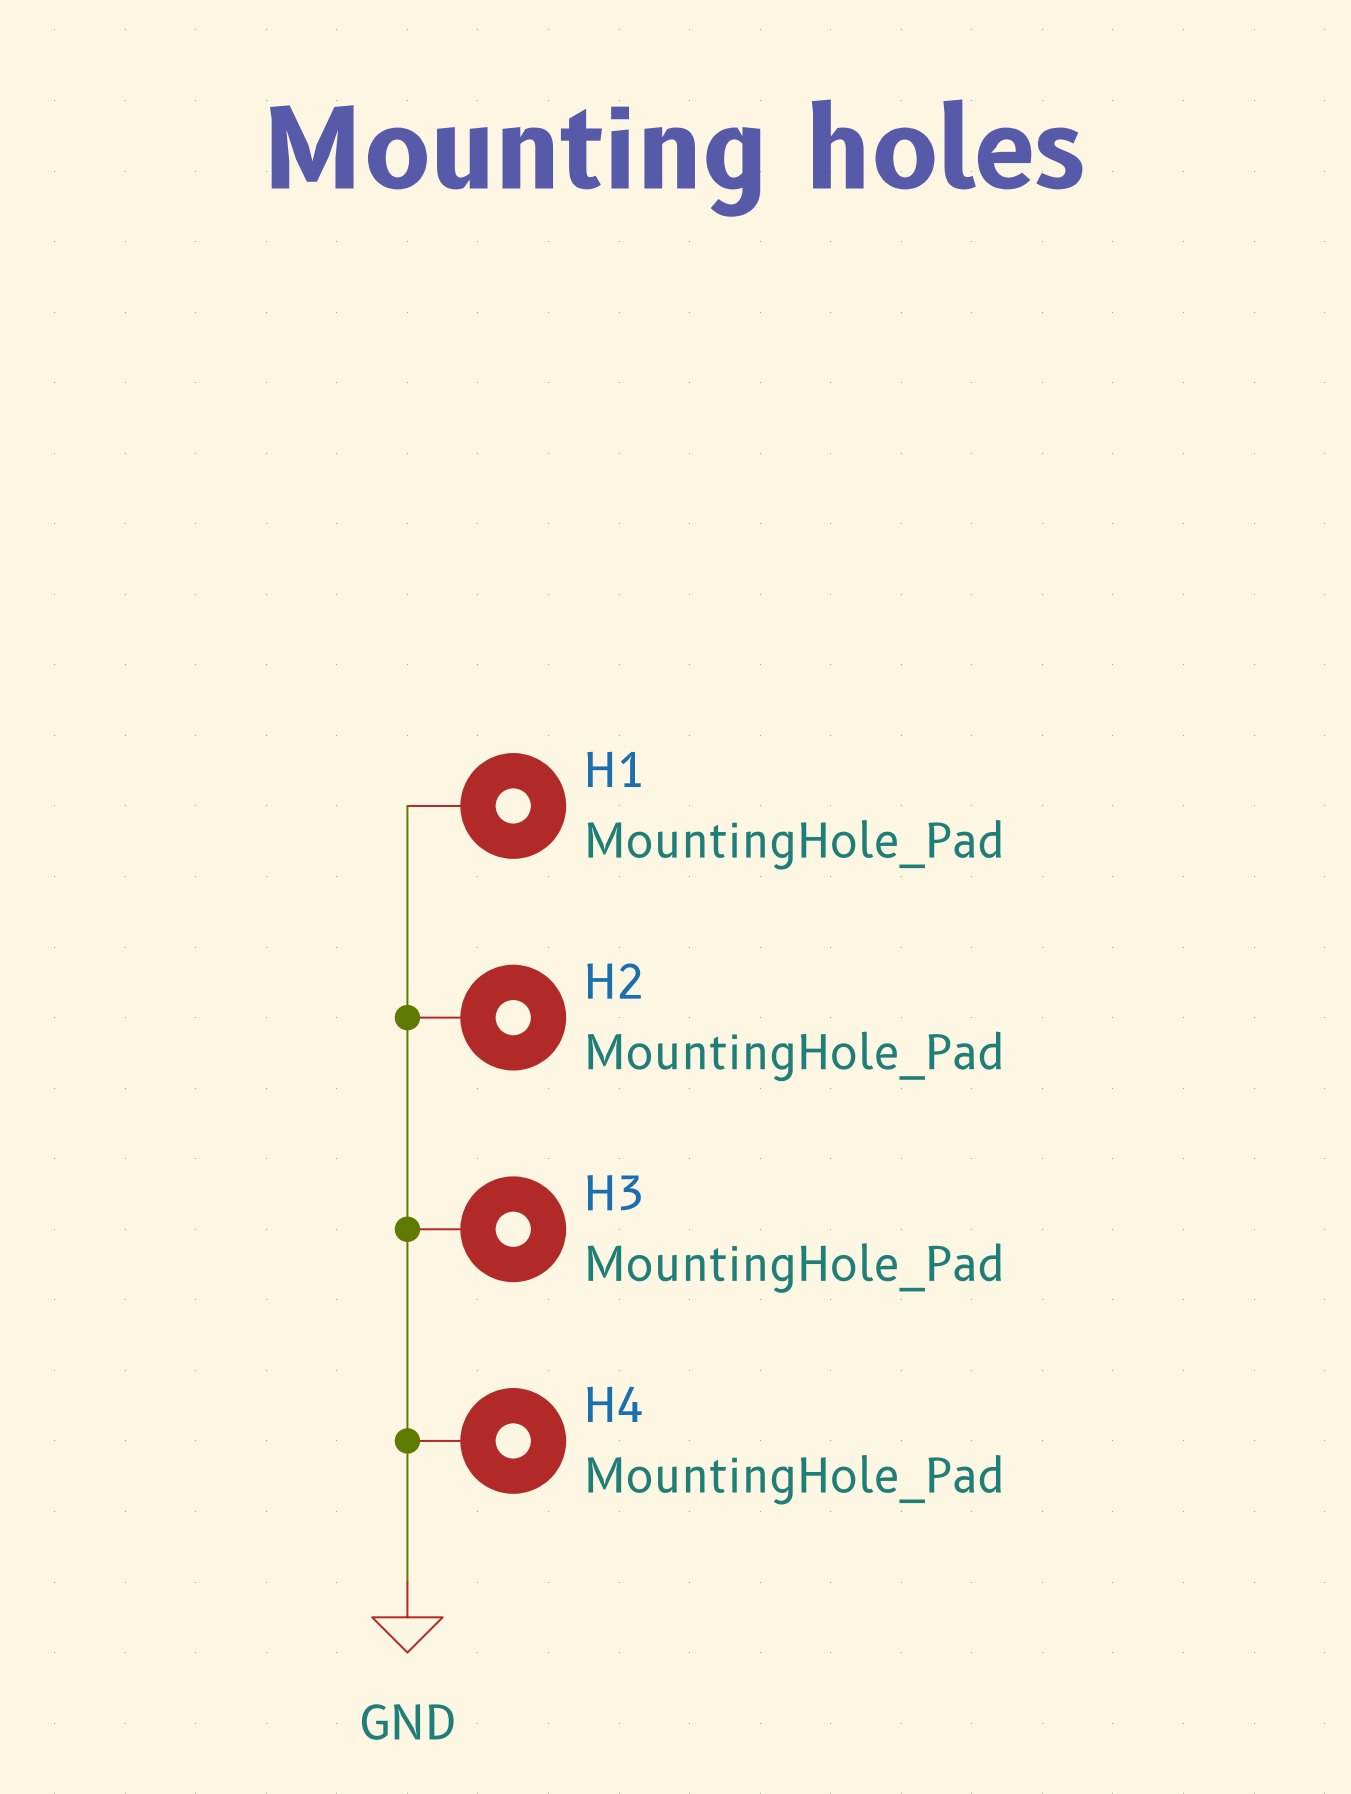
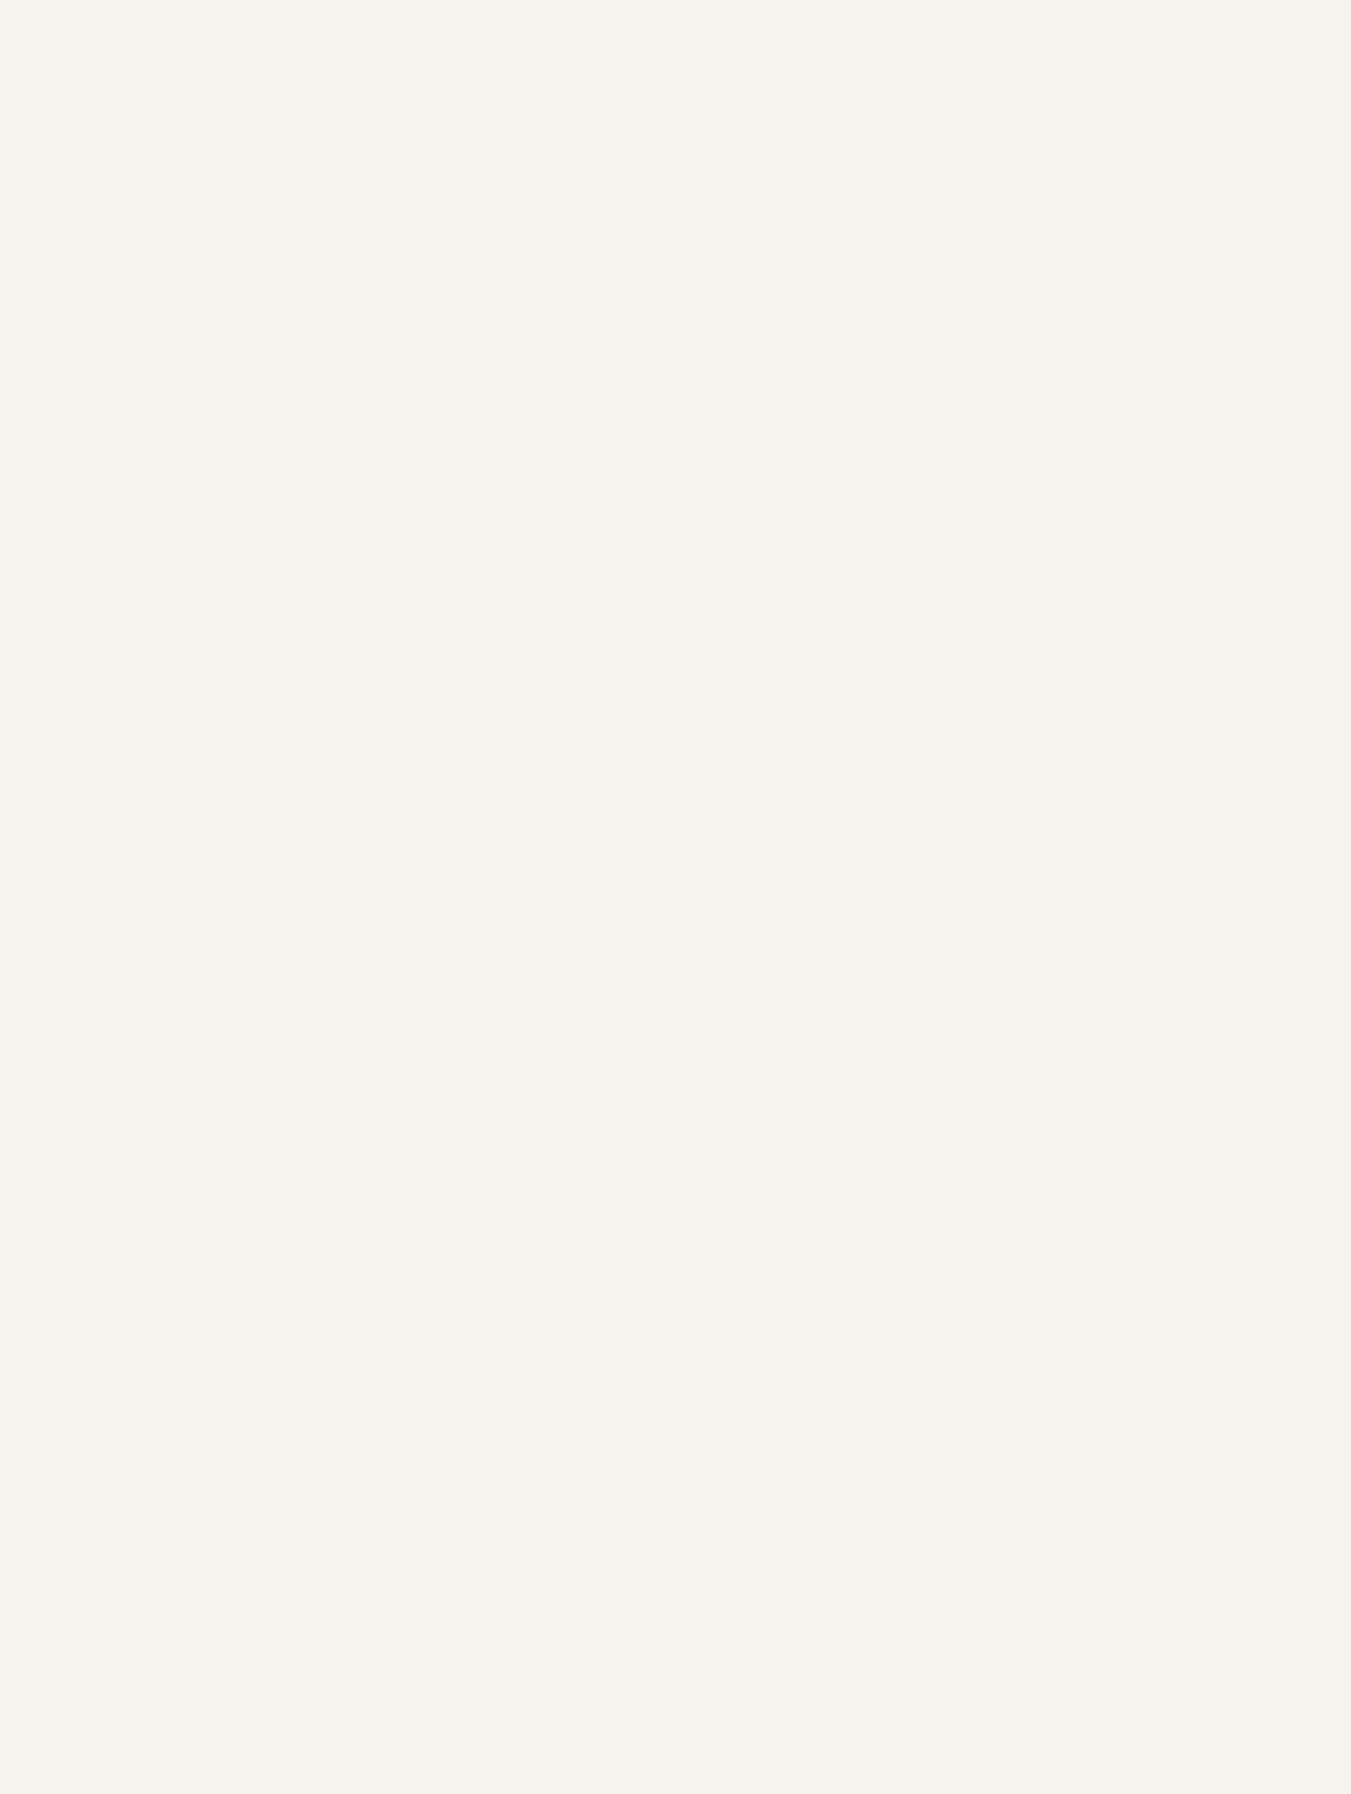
text: Mounting holes (676, 158) -> none
wire: (407, 805) (407, 1582) -> none
H1: MountingHole_Pad (486, 805) -> none
junction: (407, 1017) -> none
H2: MountingHole_Pad (486, 1017) -> none
junction: (407, 1229) -> none
H3: MountingHole_Pad (486, 1229) -> none
junction: (407, 1440) -> none
H4: MountingHole_Pad (486, 1440) -> none
power symbol: GND (407, 1617) -> none

